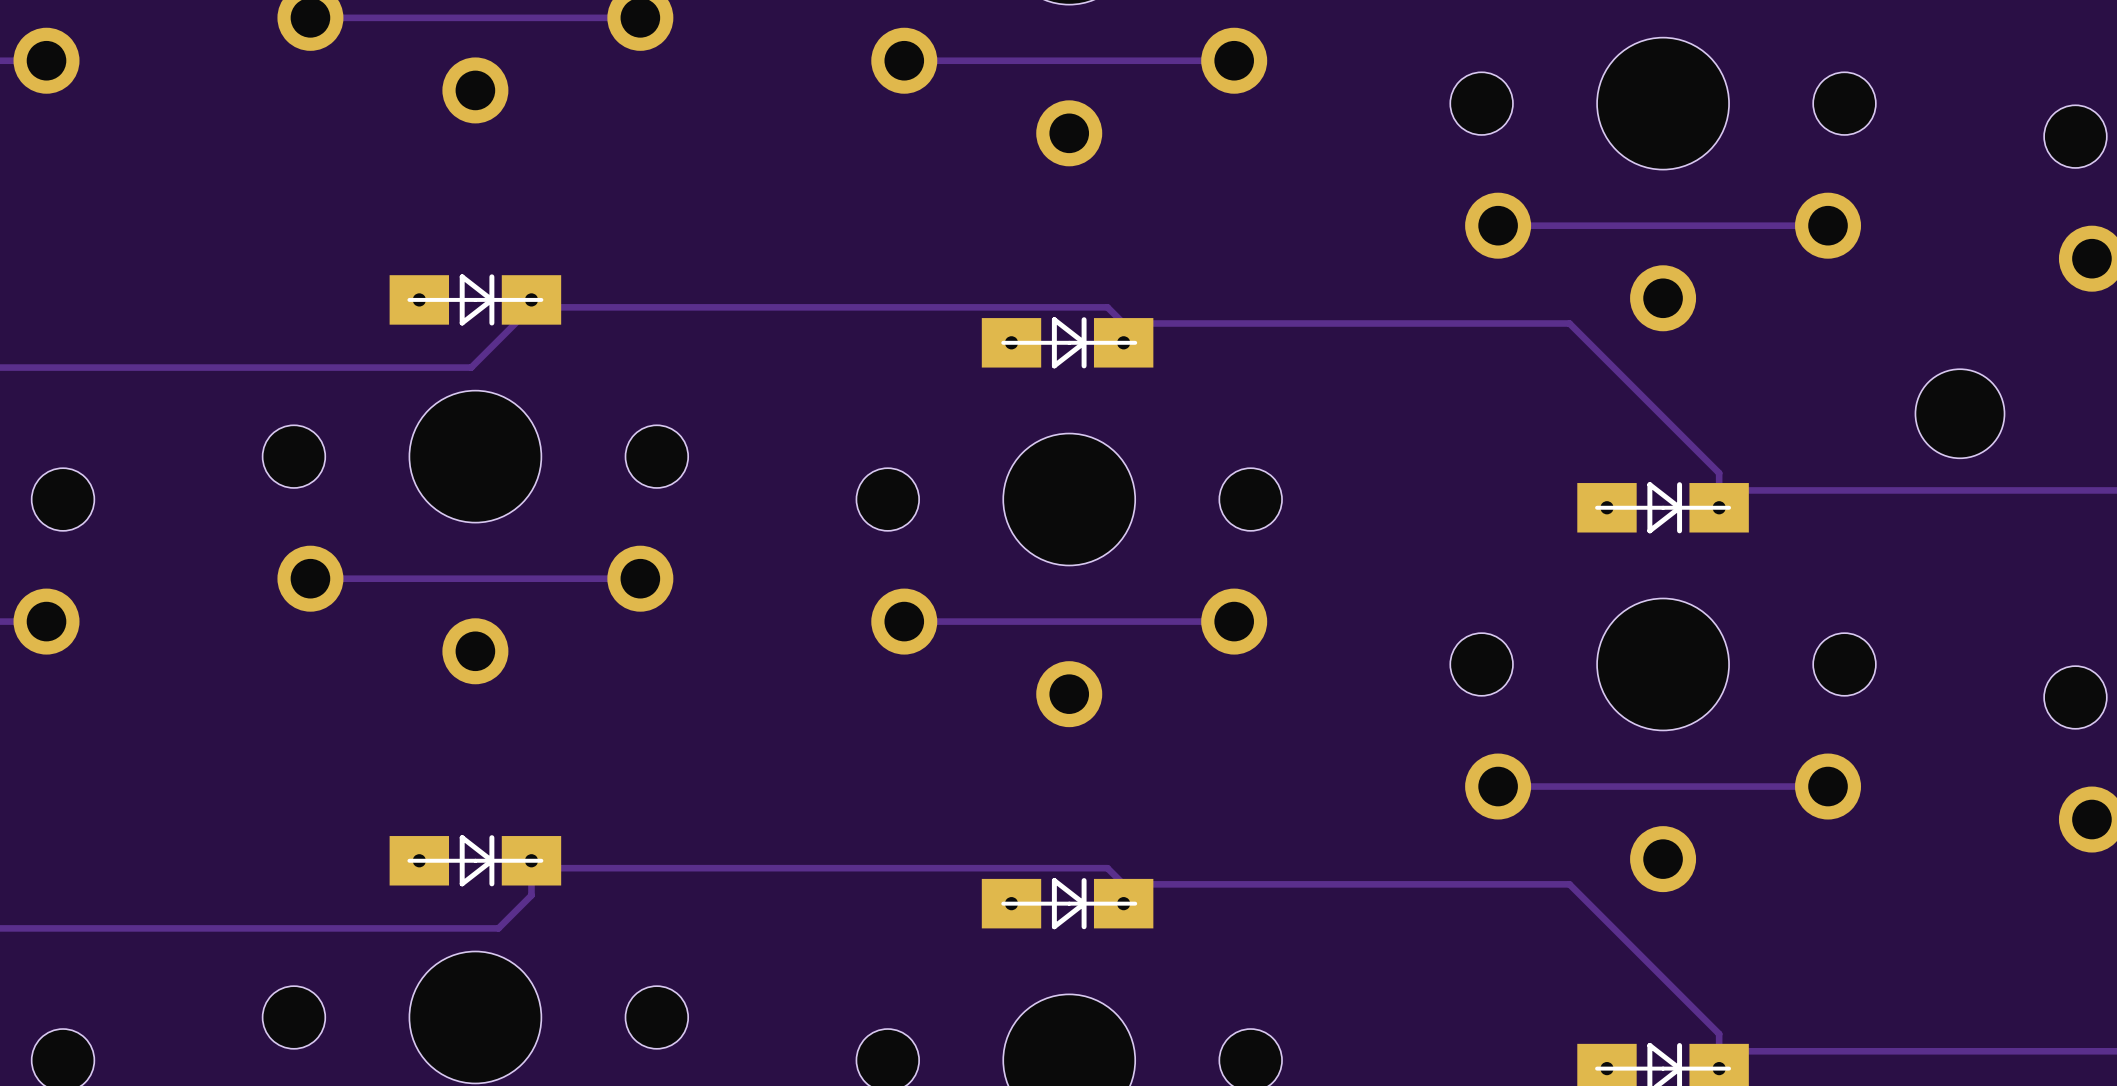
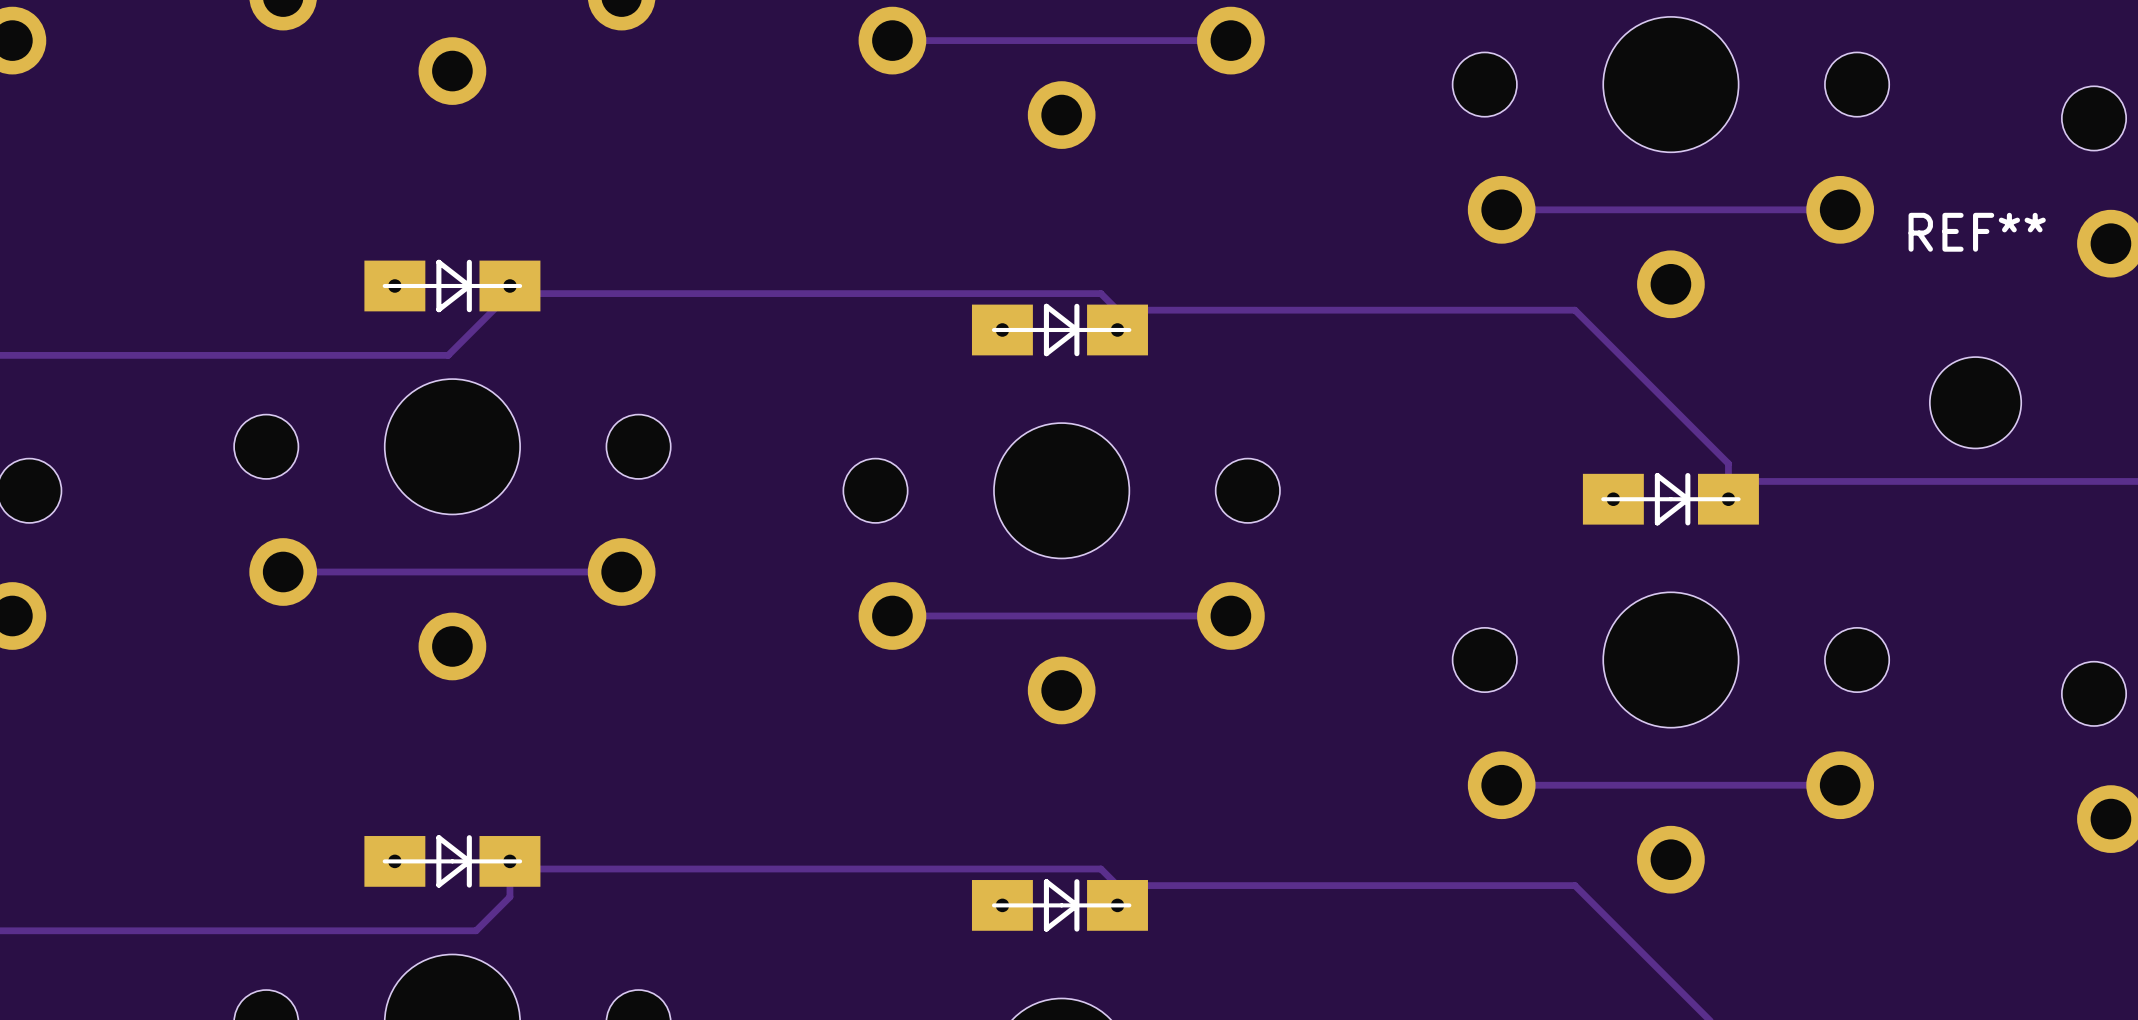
REF** name: none -> REF** (1977, 232)

